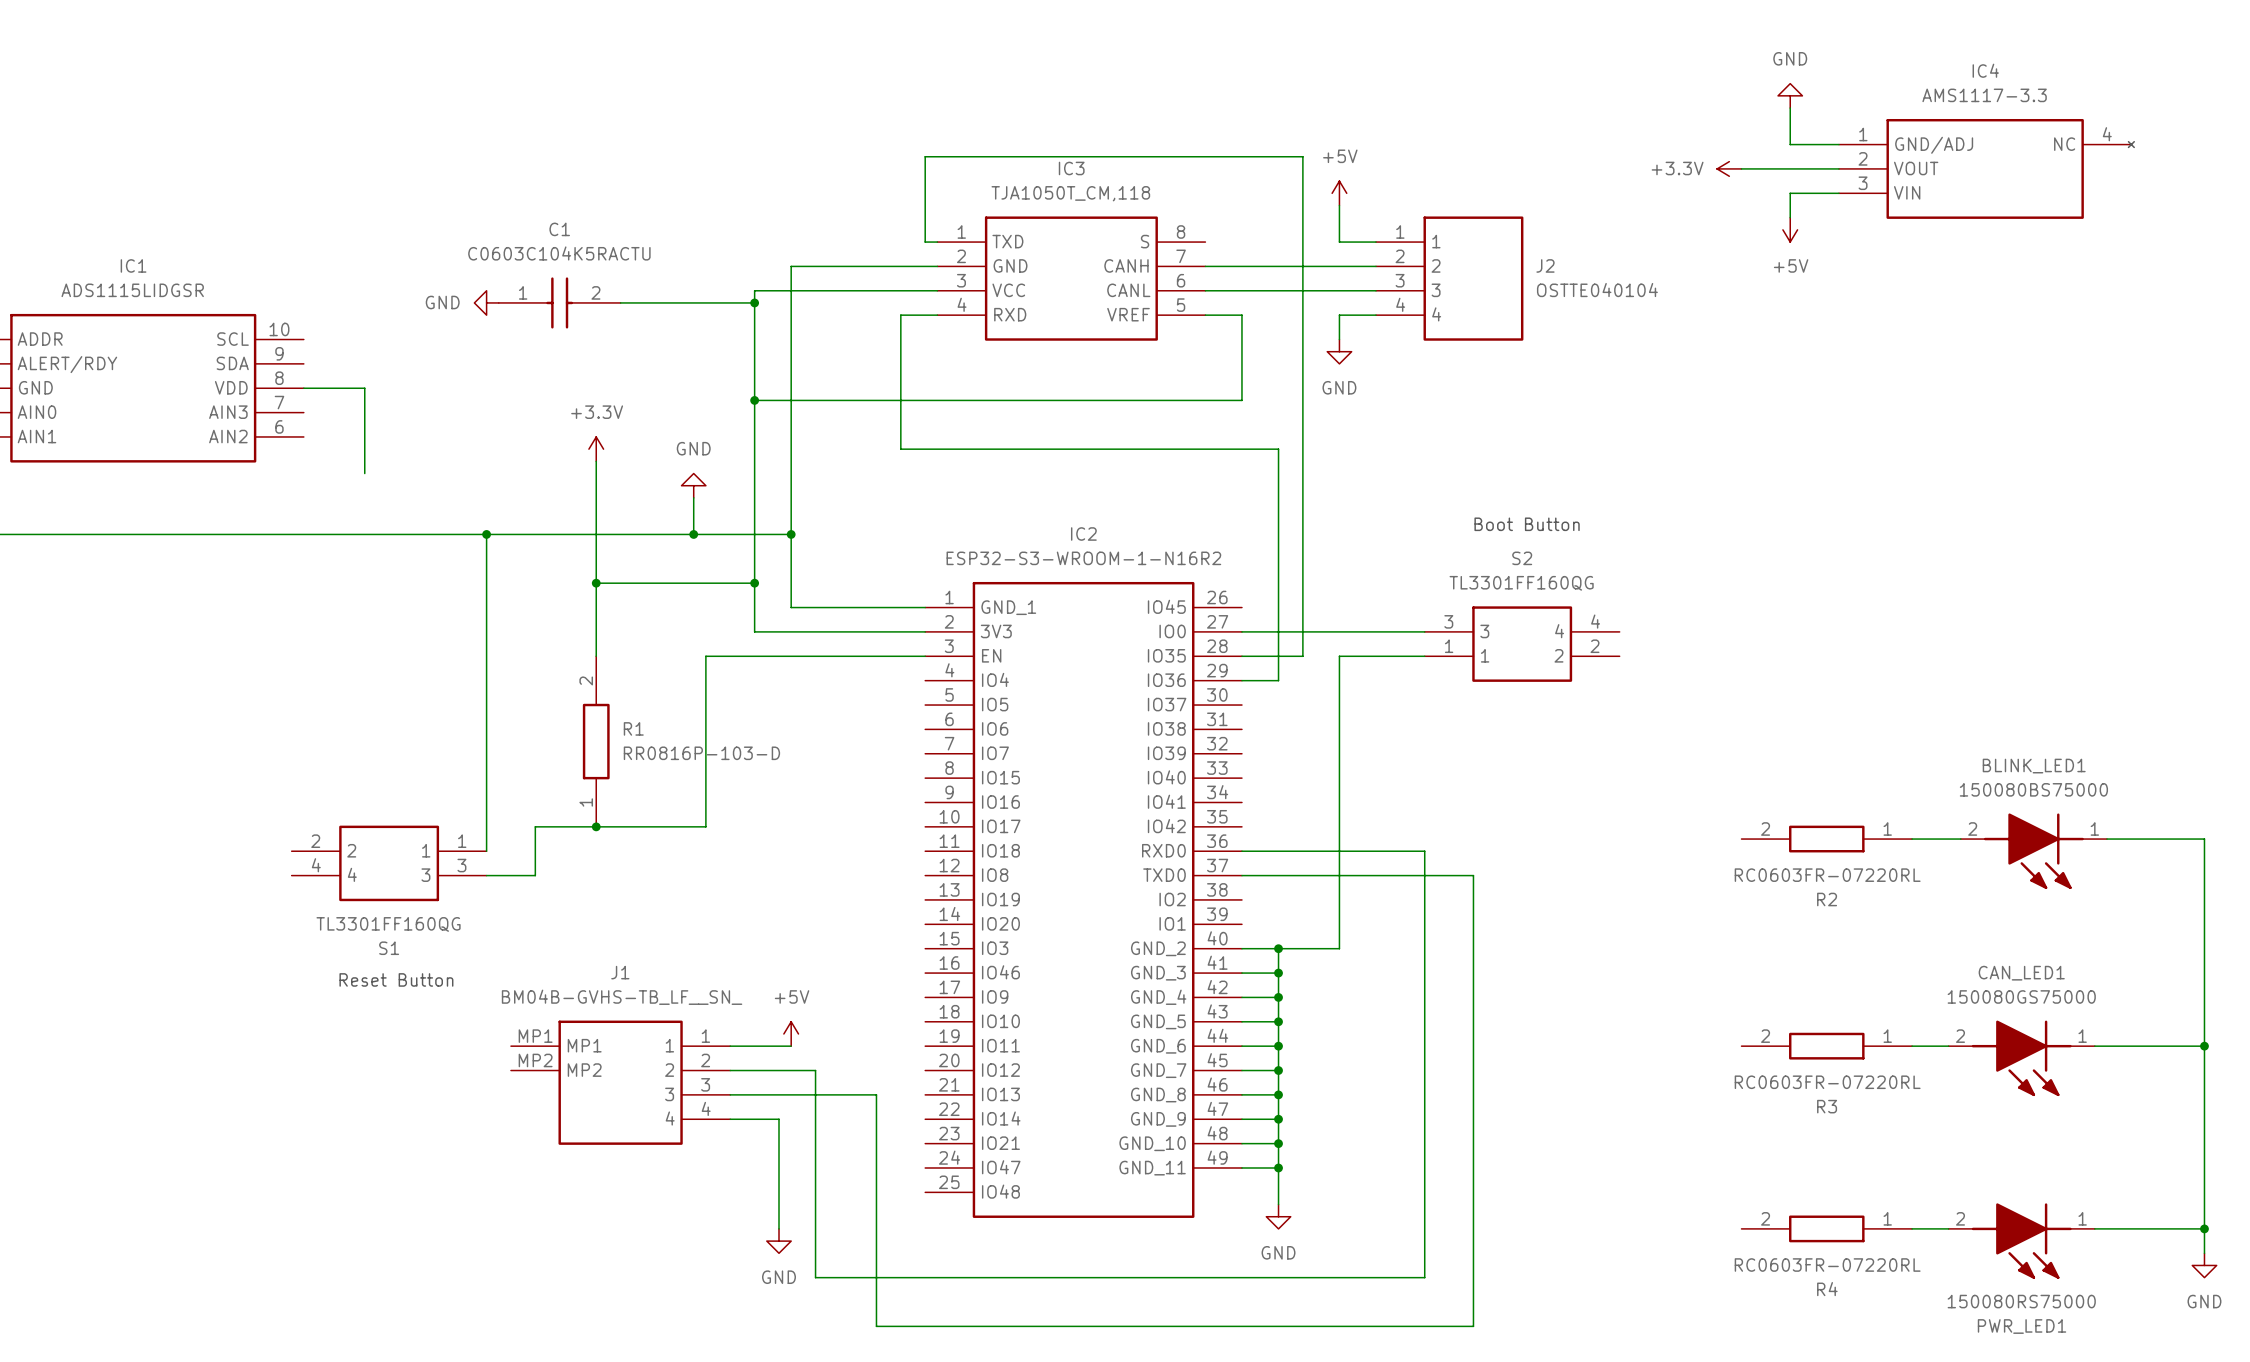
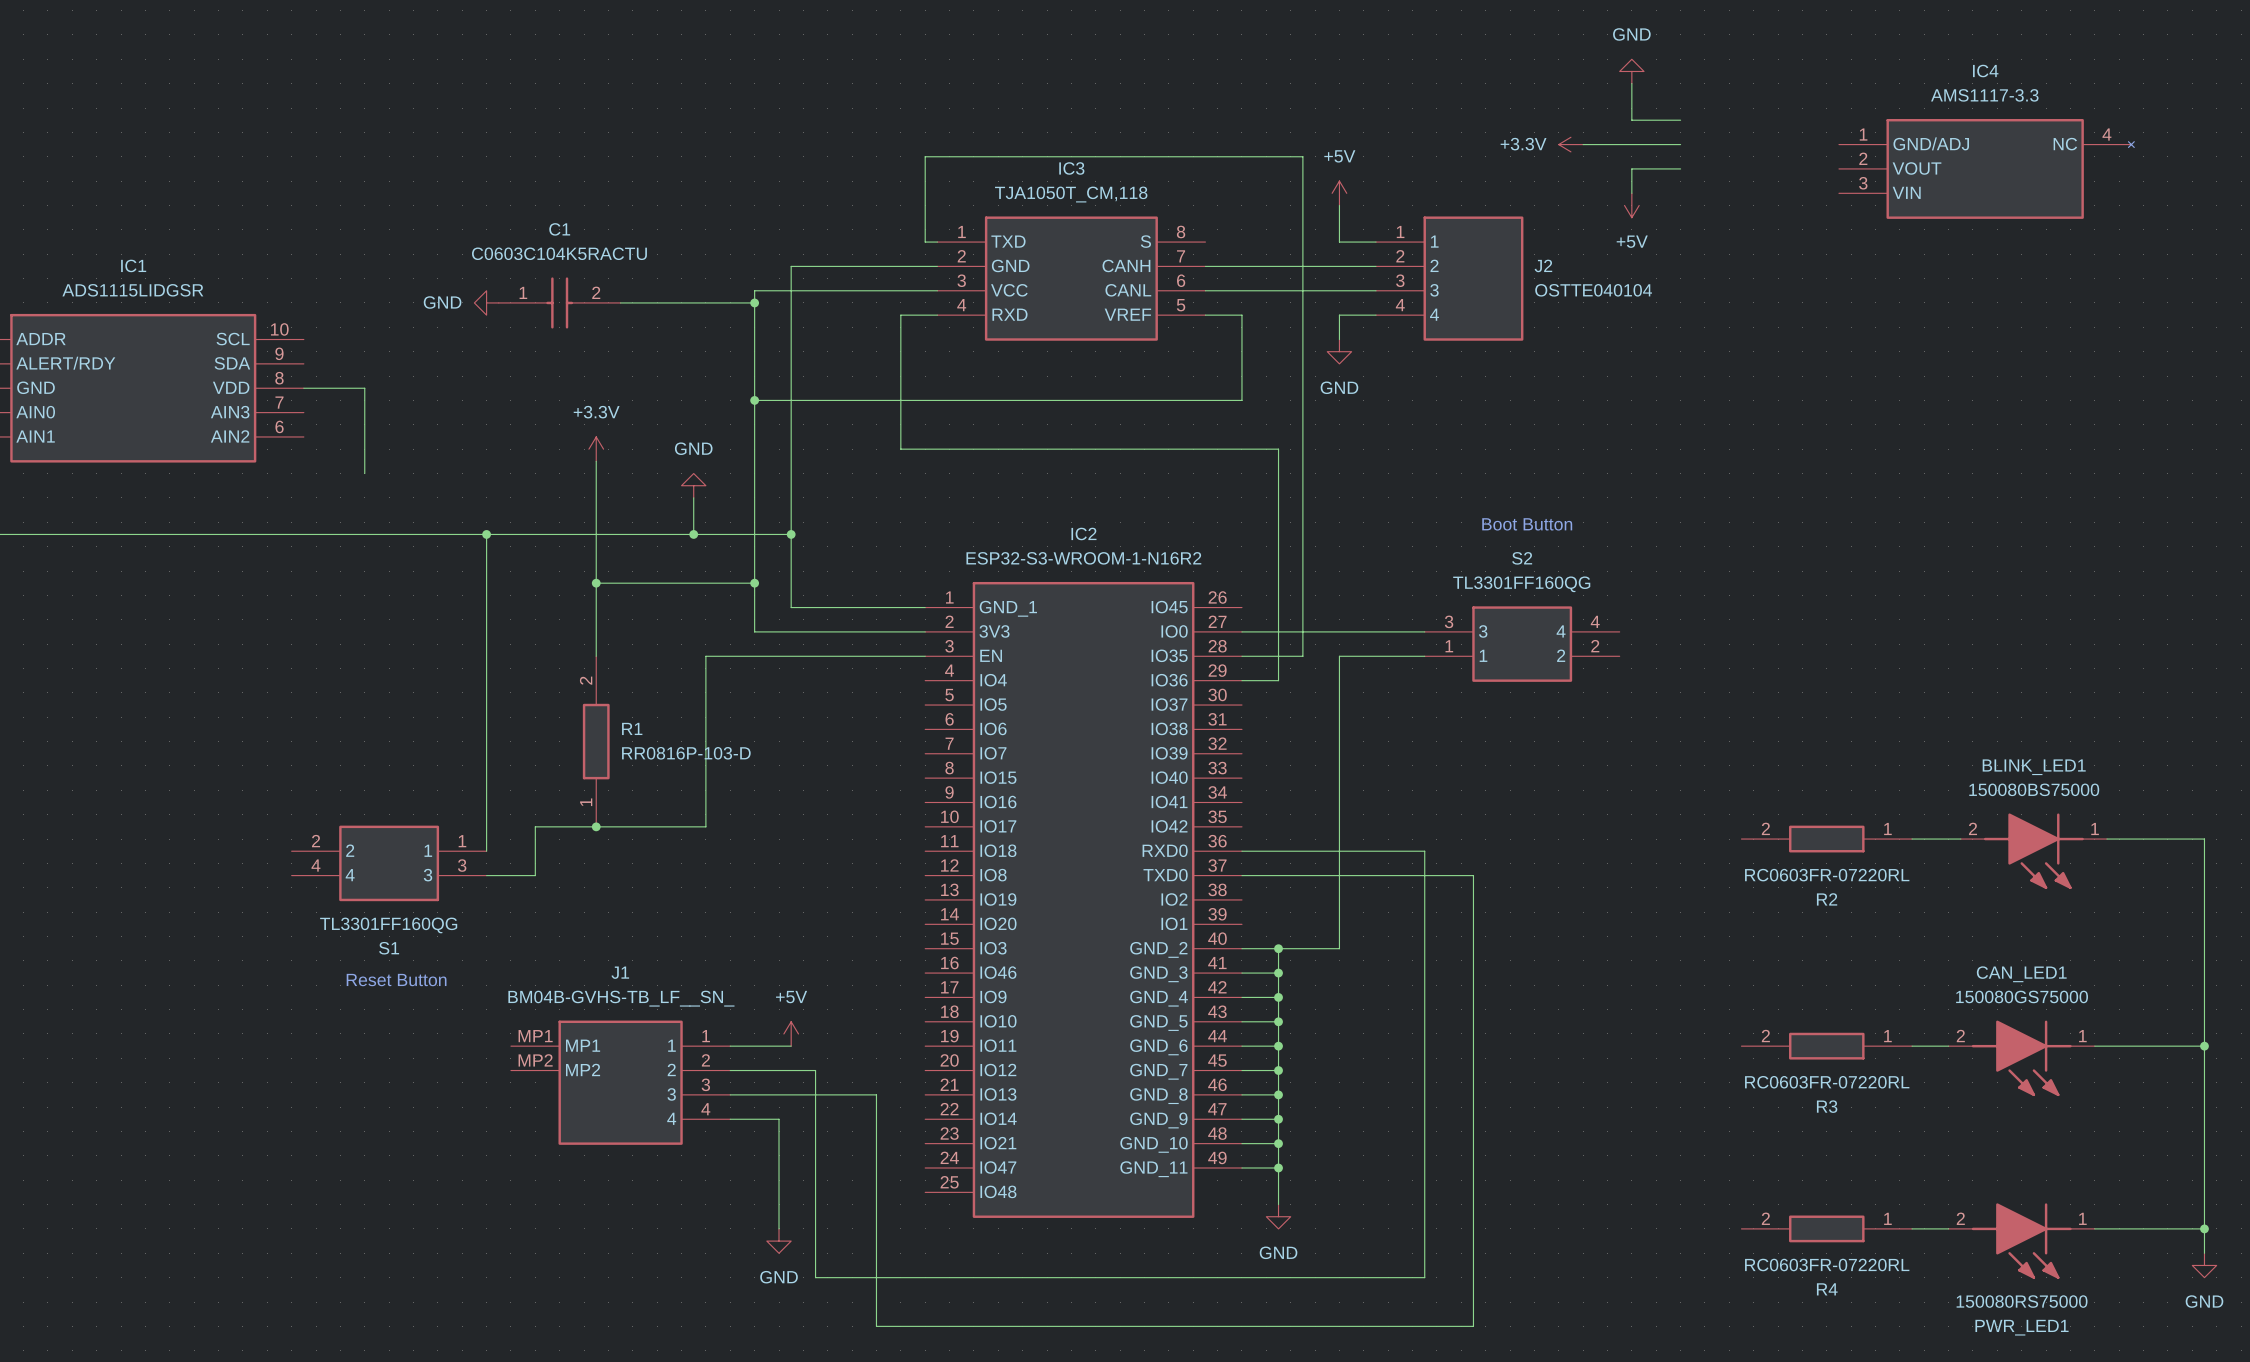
power symbol position: GND (1790, 95) -> GND (1631, 71)
wire: (1790, 108) (1790, 144) (1838, 144) -> (1631, 83) (1631, 120) (1680, 120)
power symbol position: +3.3V (1729, 168) -> +3.3V (1570, 144)
wire: (1741, 168) (1838, 168) -> (1583, 144) (1680, 144)
wire: (1838, 193) (1790, 193) (1790, 217) -> (1680, 168) (1631, 168) (1631, 193)
power symbol position: +5V (1790, 229) -> +5V (1631, 205)

